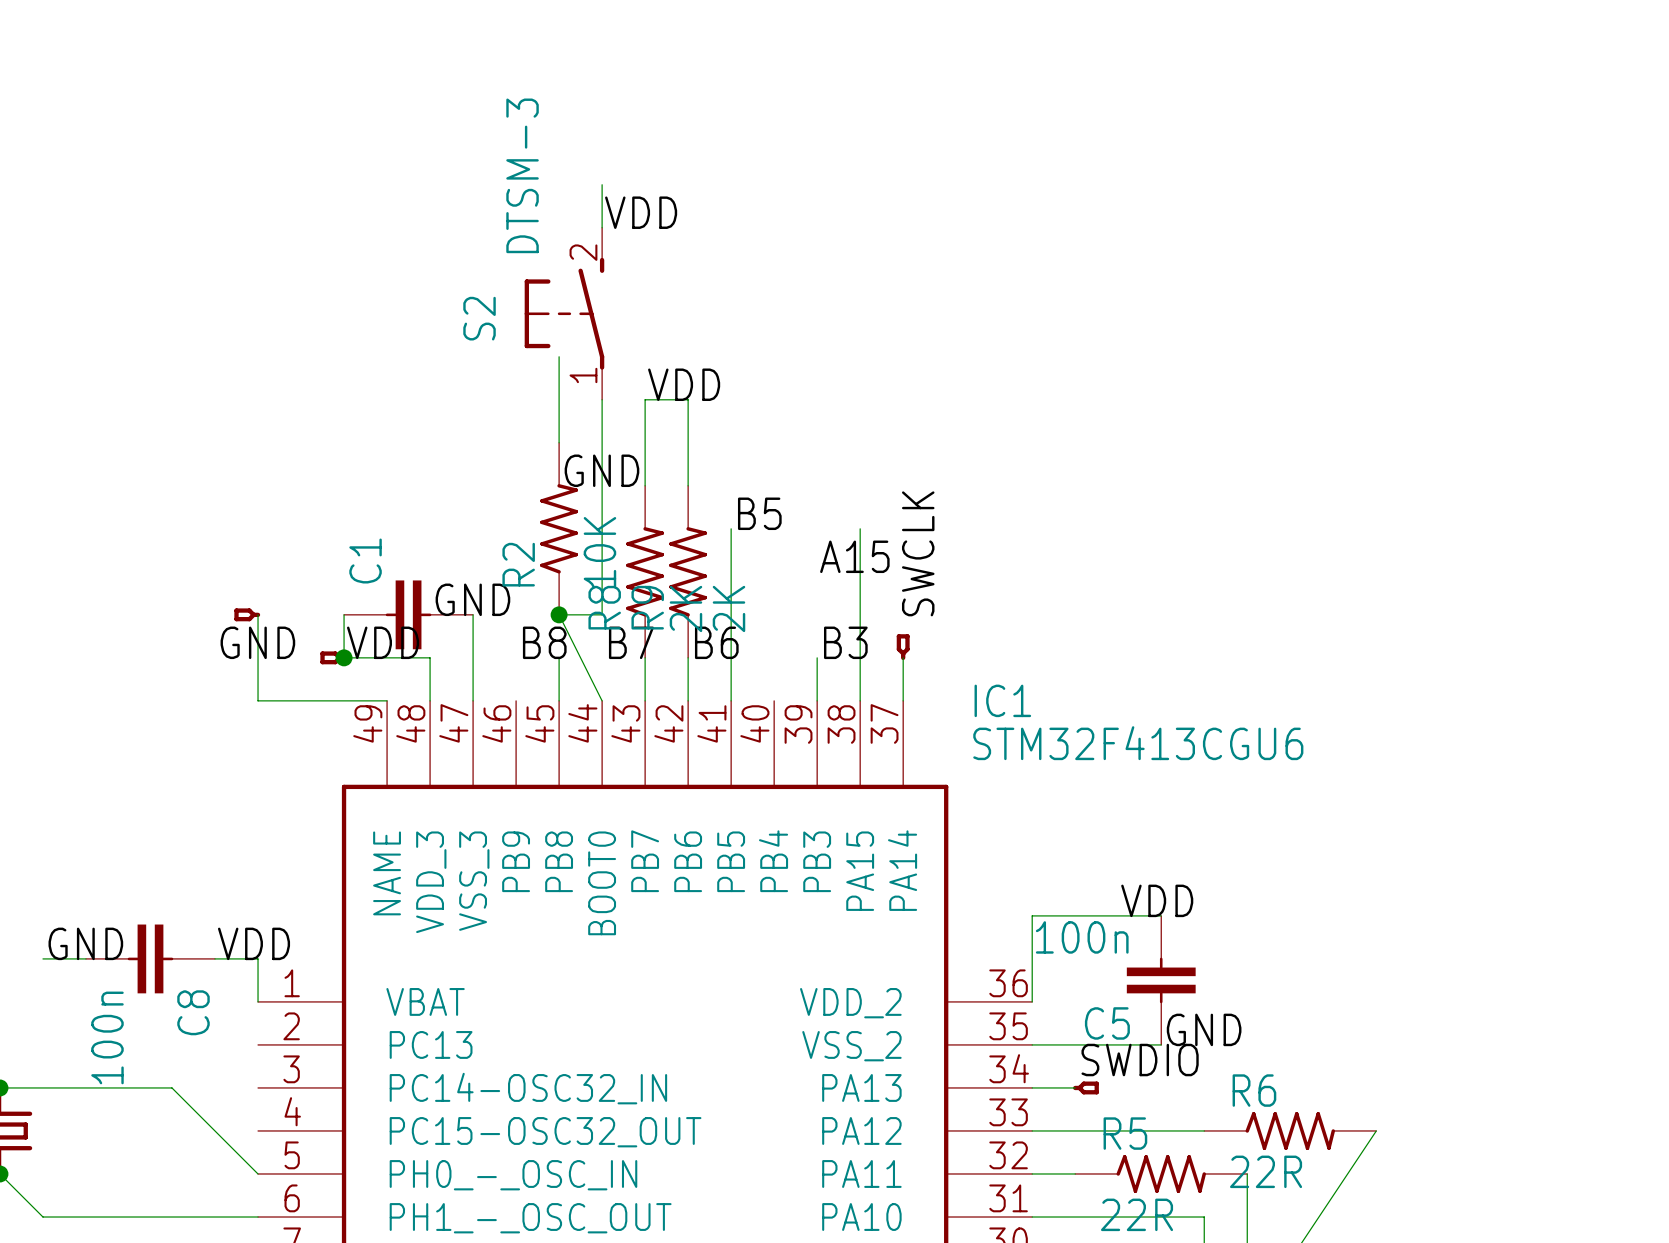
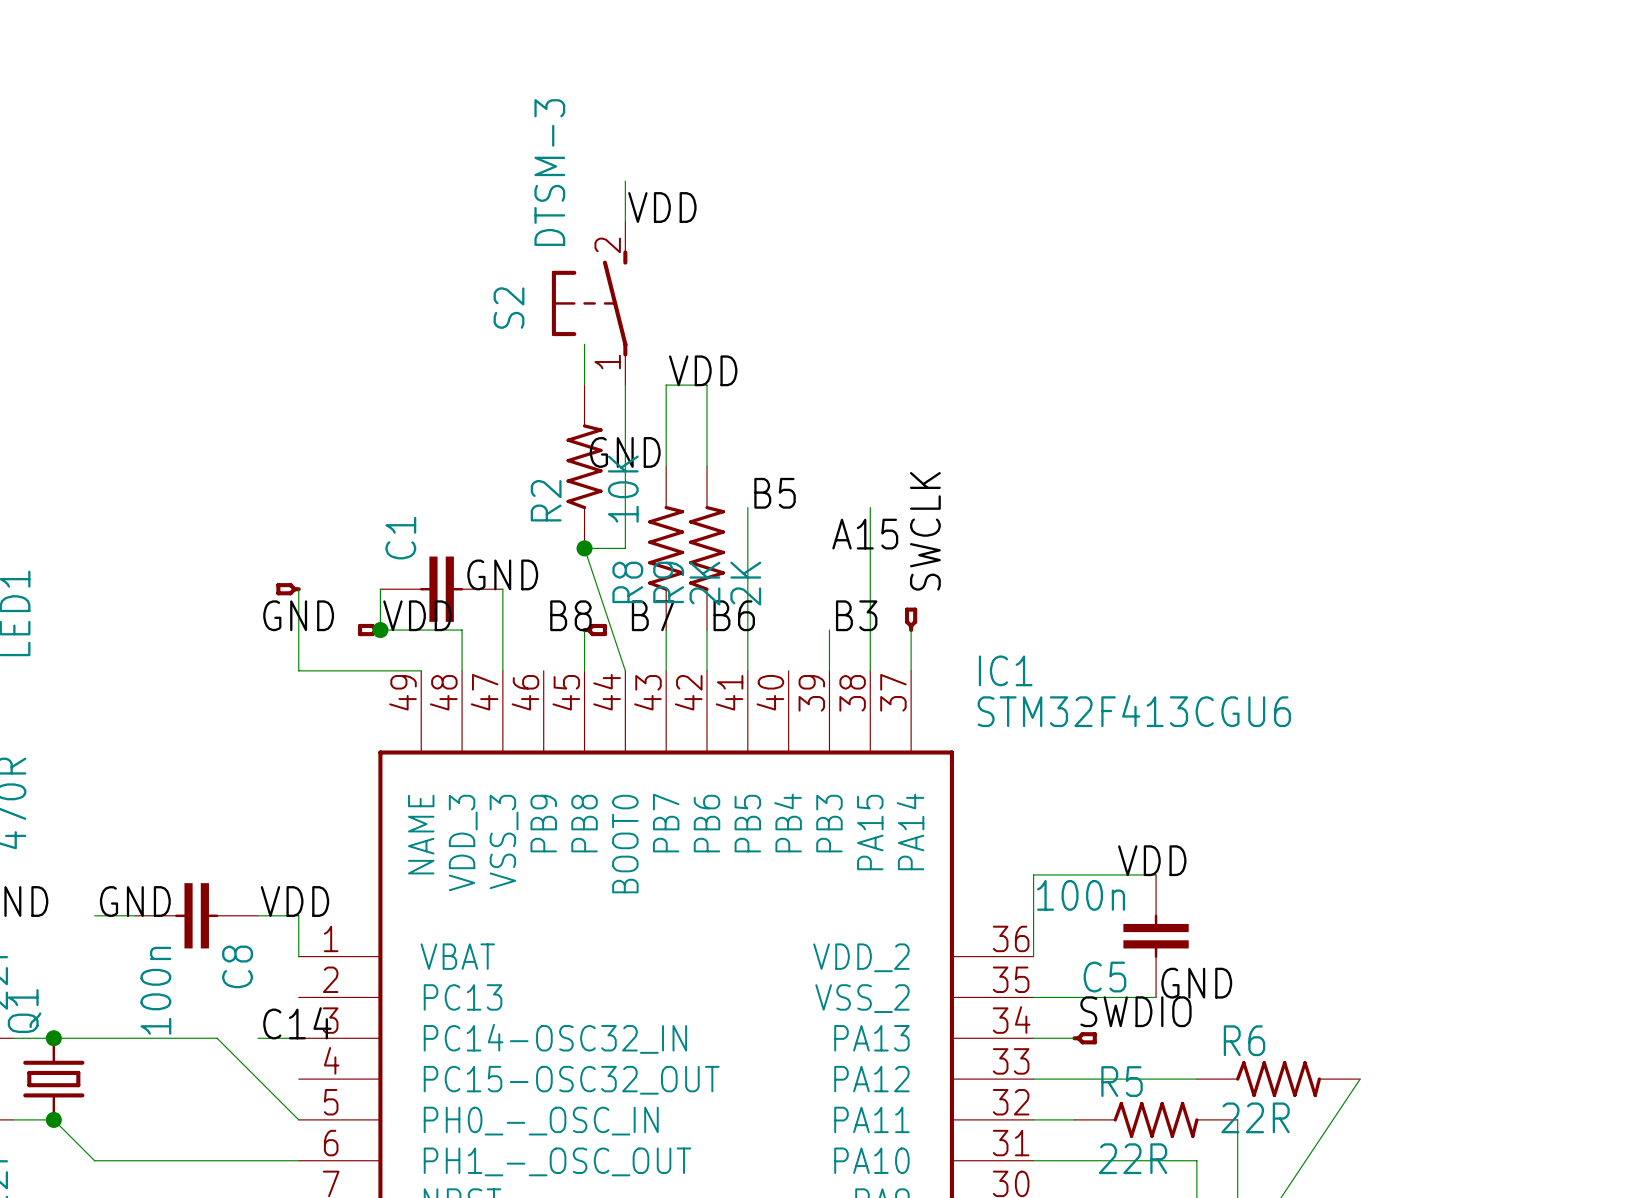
R2 position: (559, 528) -> (584, 466)
wire: (602, 571) (602, 614) (559, 614) (602, 700) -> (625, 548) (584, 548) (625, 670)
junction position: (559, 614) -> (584, 548)
part: none -> (594, 630)
label: none -> C14 (297, 1023)
wire: none -> (257, 1038) (298, 1038)

